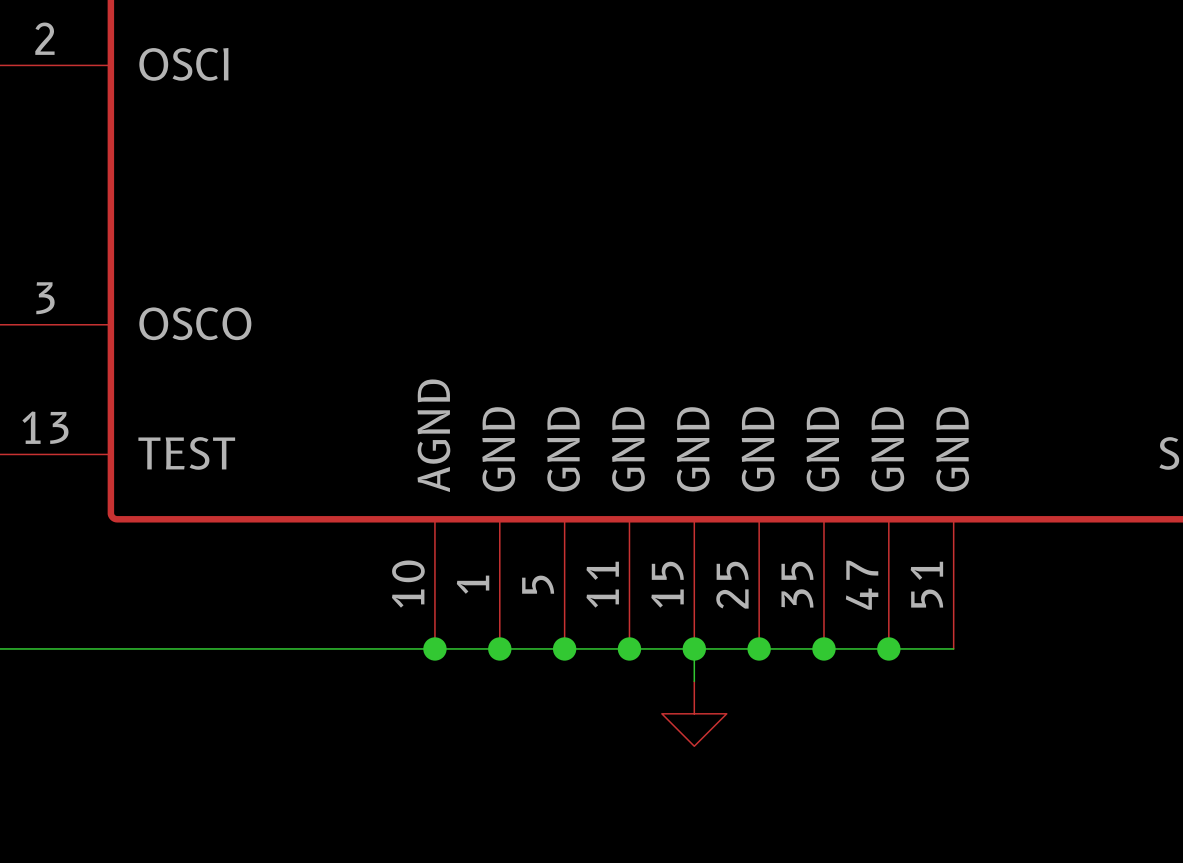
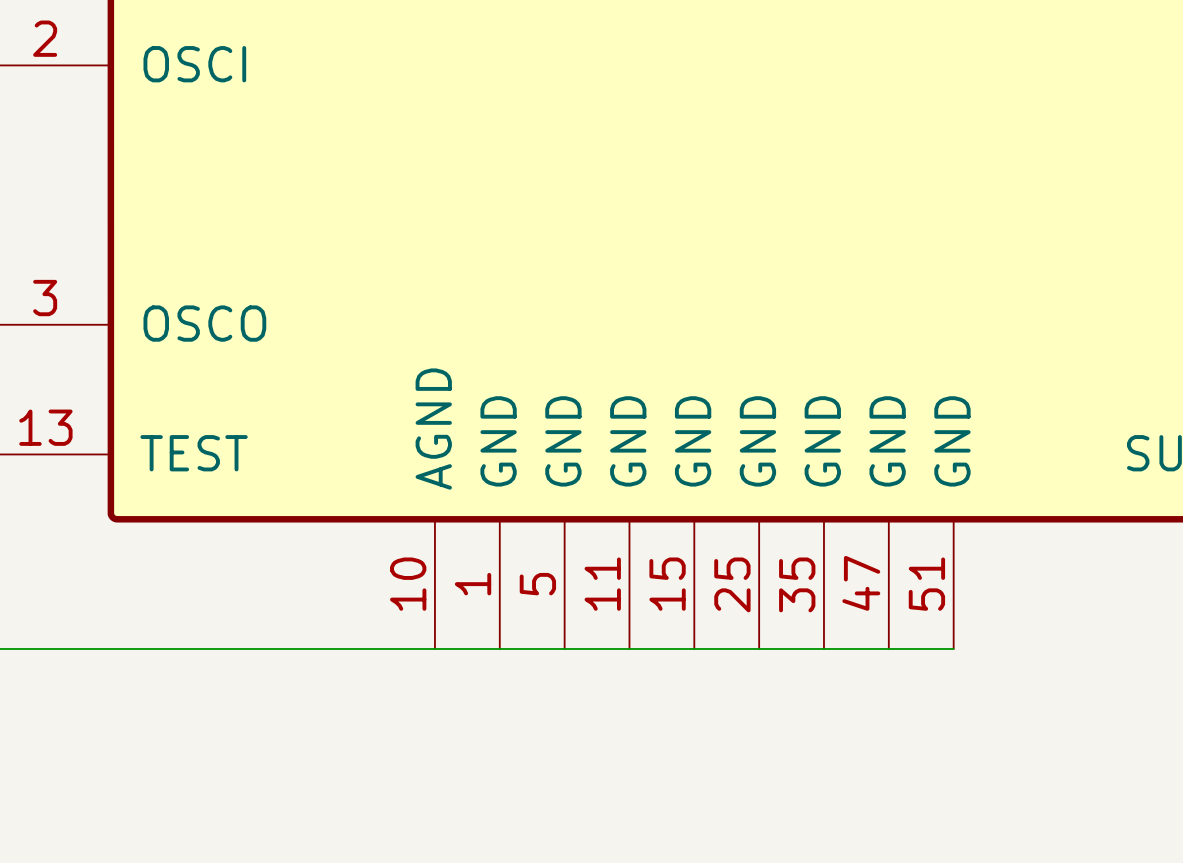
junction: (434, 648) -> none
junction: (499, 648) -> none
junction: (564, 648) -> none
junction: (629, 648) -> none
wire: (694, 648) (694, 681) -> none
junction: (694, 648) -> none
junction: (759, 648) -> none
junction: (823, 648) -> none
junction: (888, 648) -> none
power symbol: (694, 713) -> none

